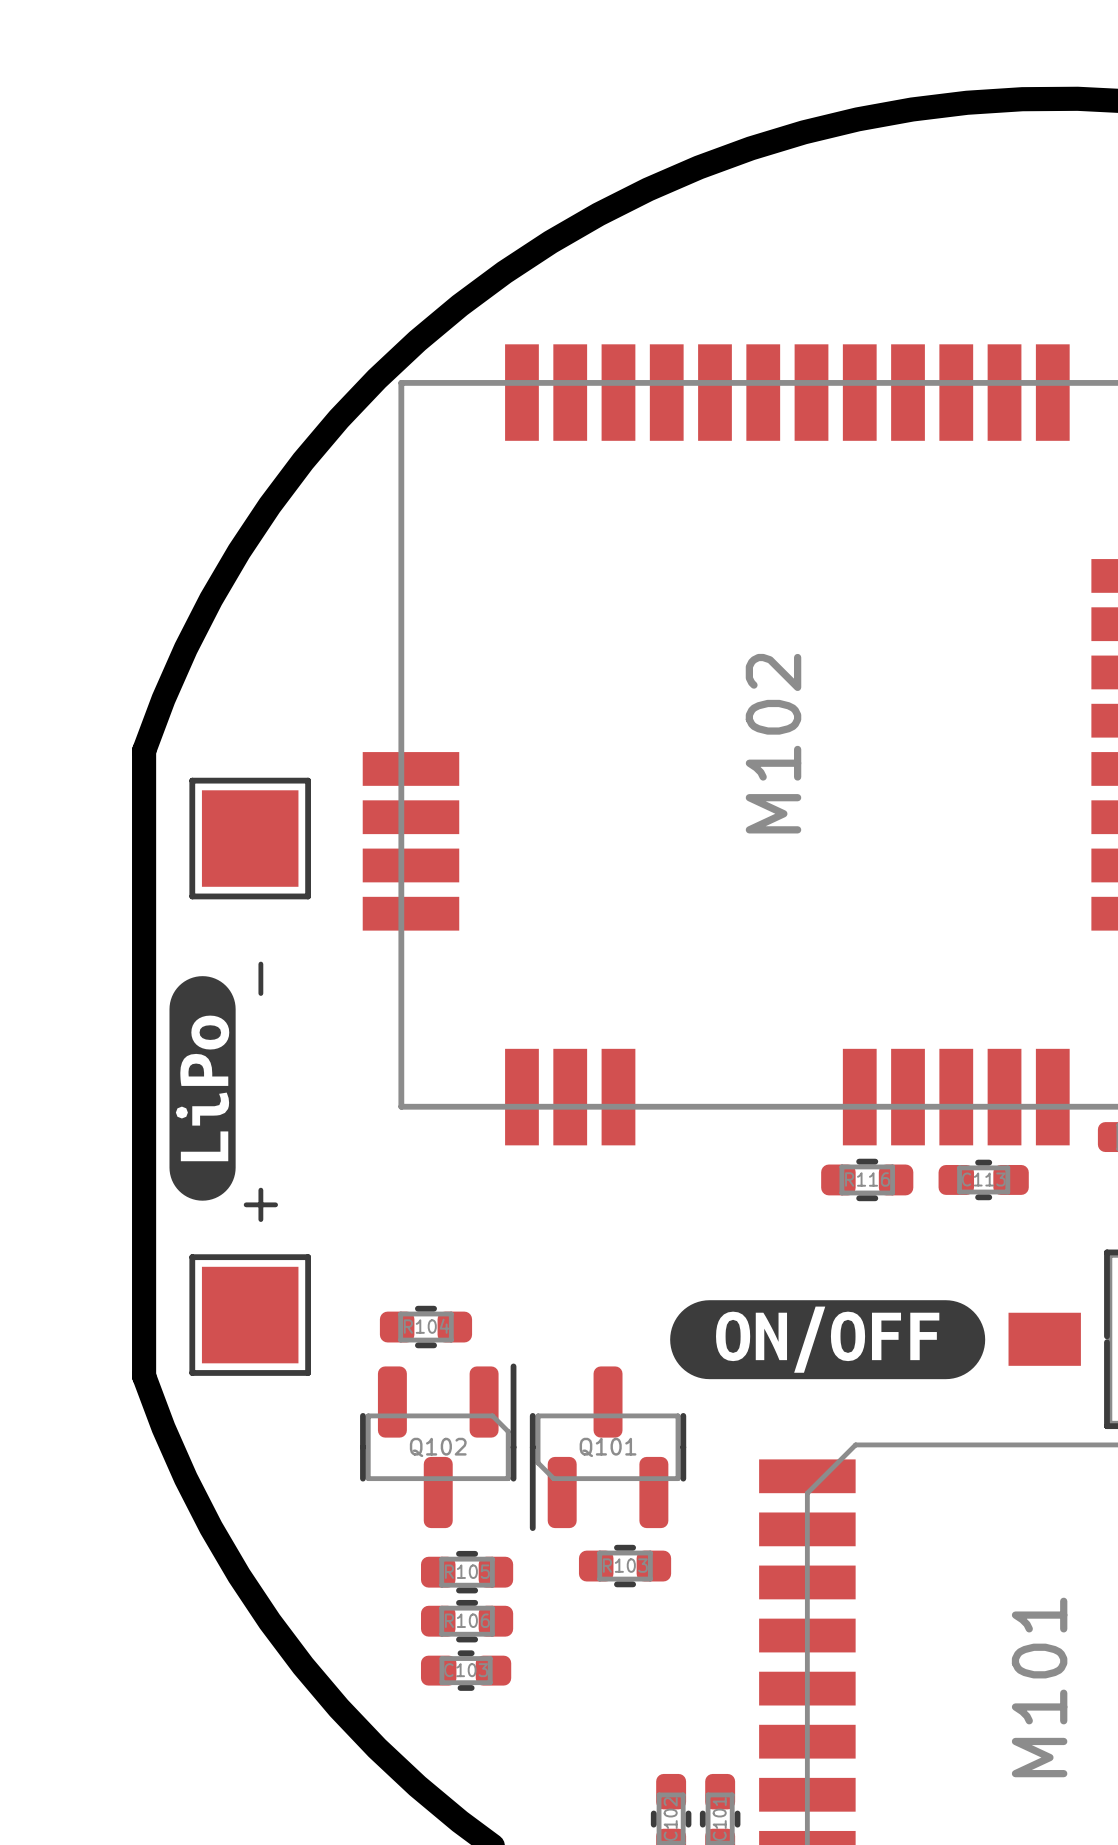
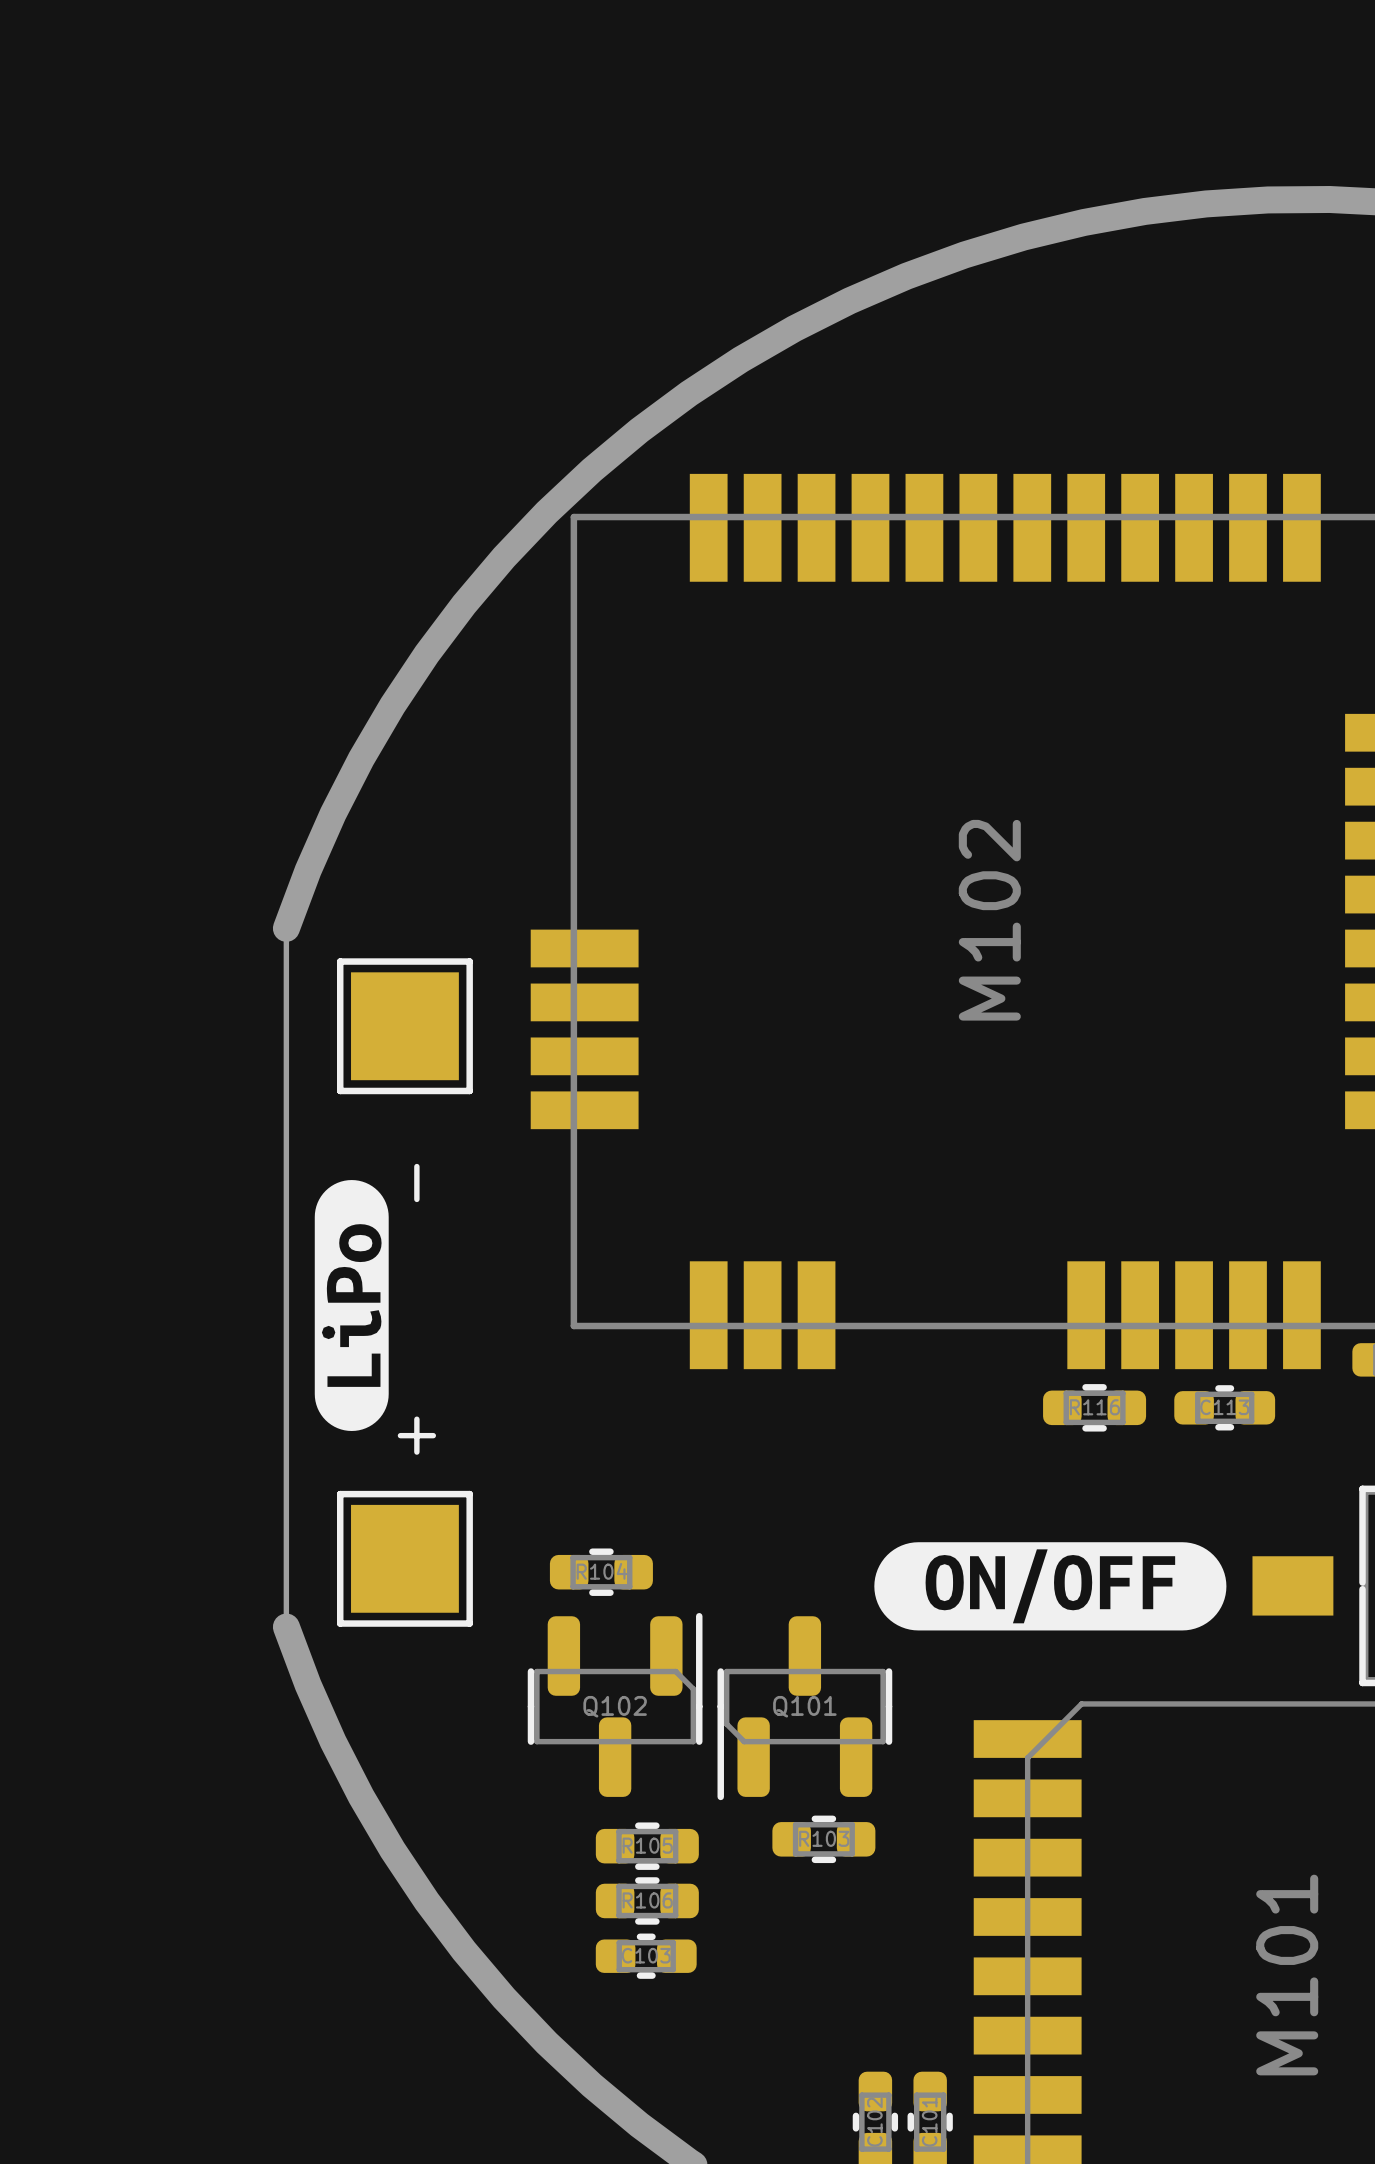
board edge width: thick (144, 750) (144, 1376) -> thin (286, 928) (286, 1627)

